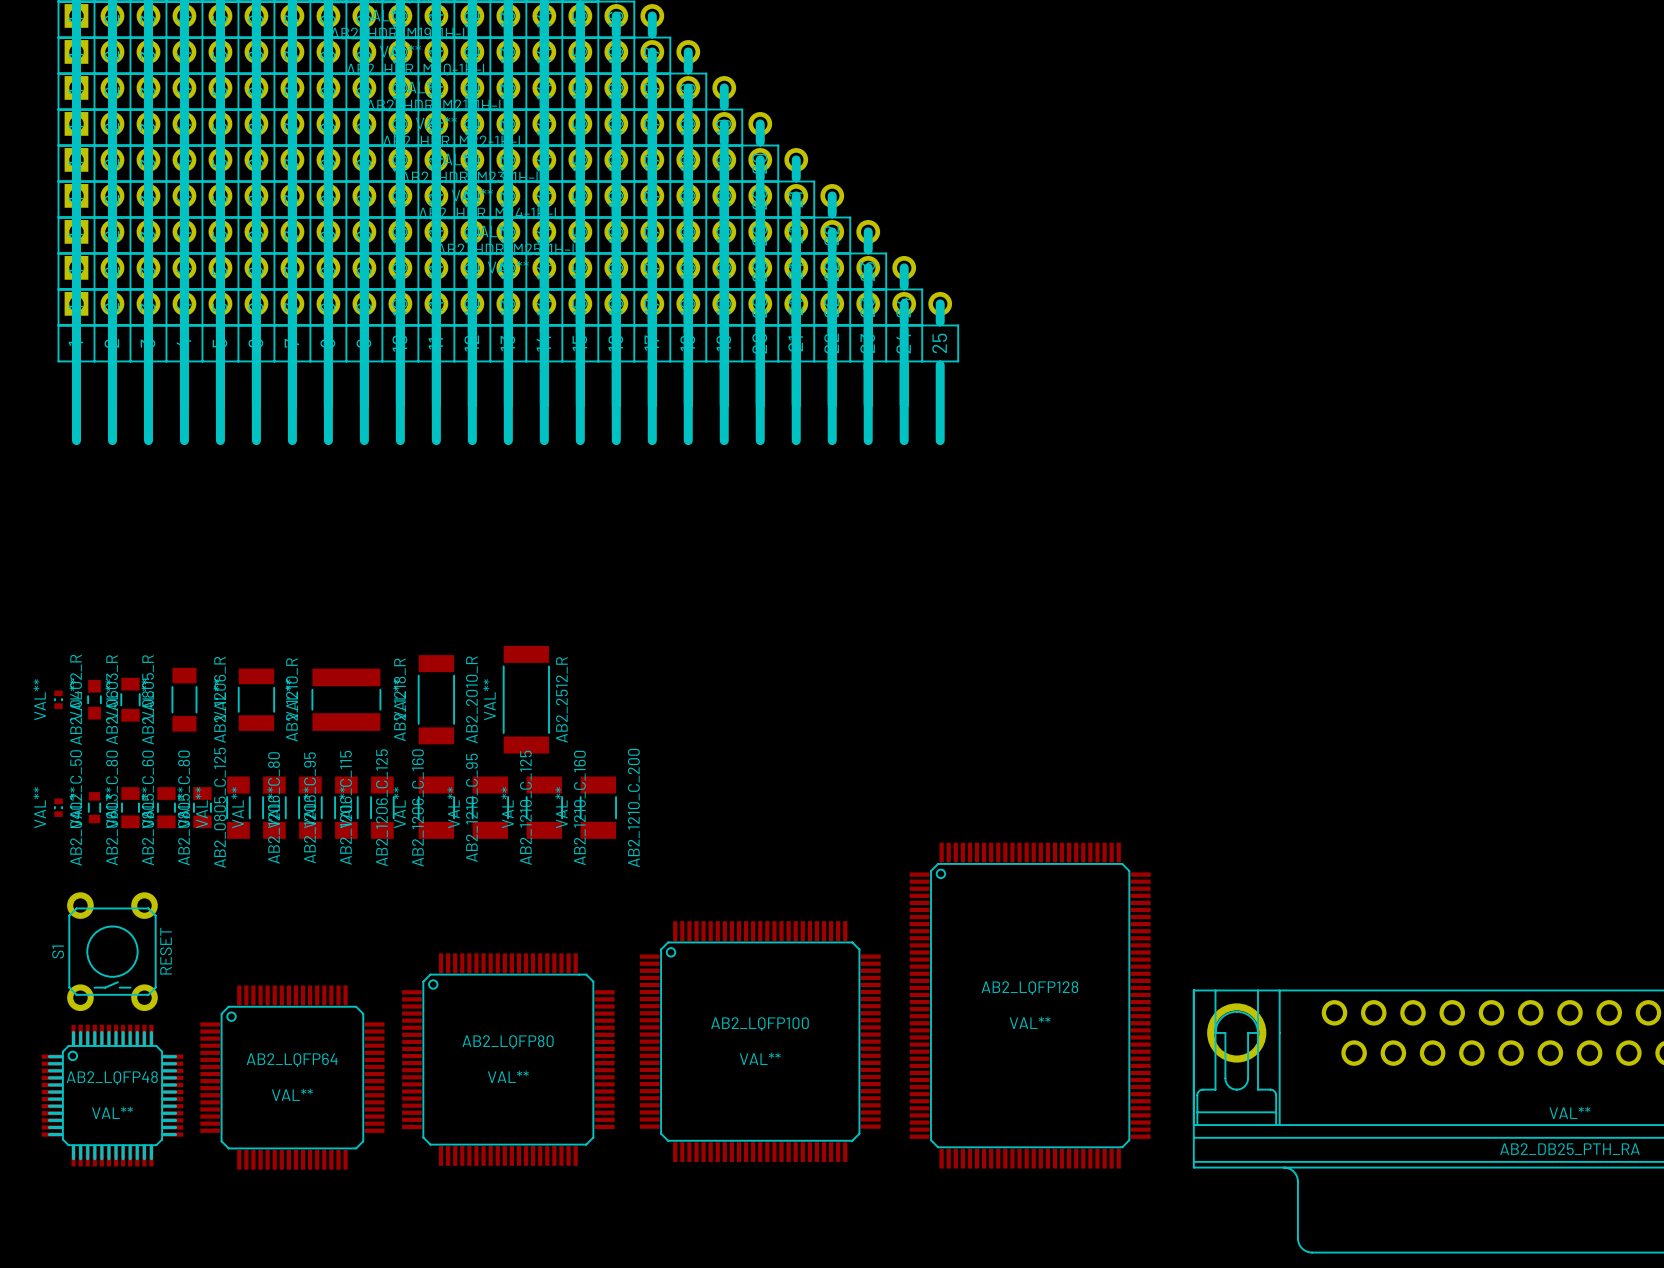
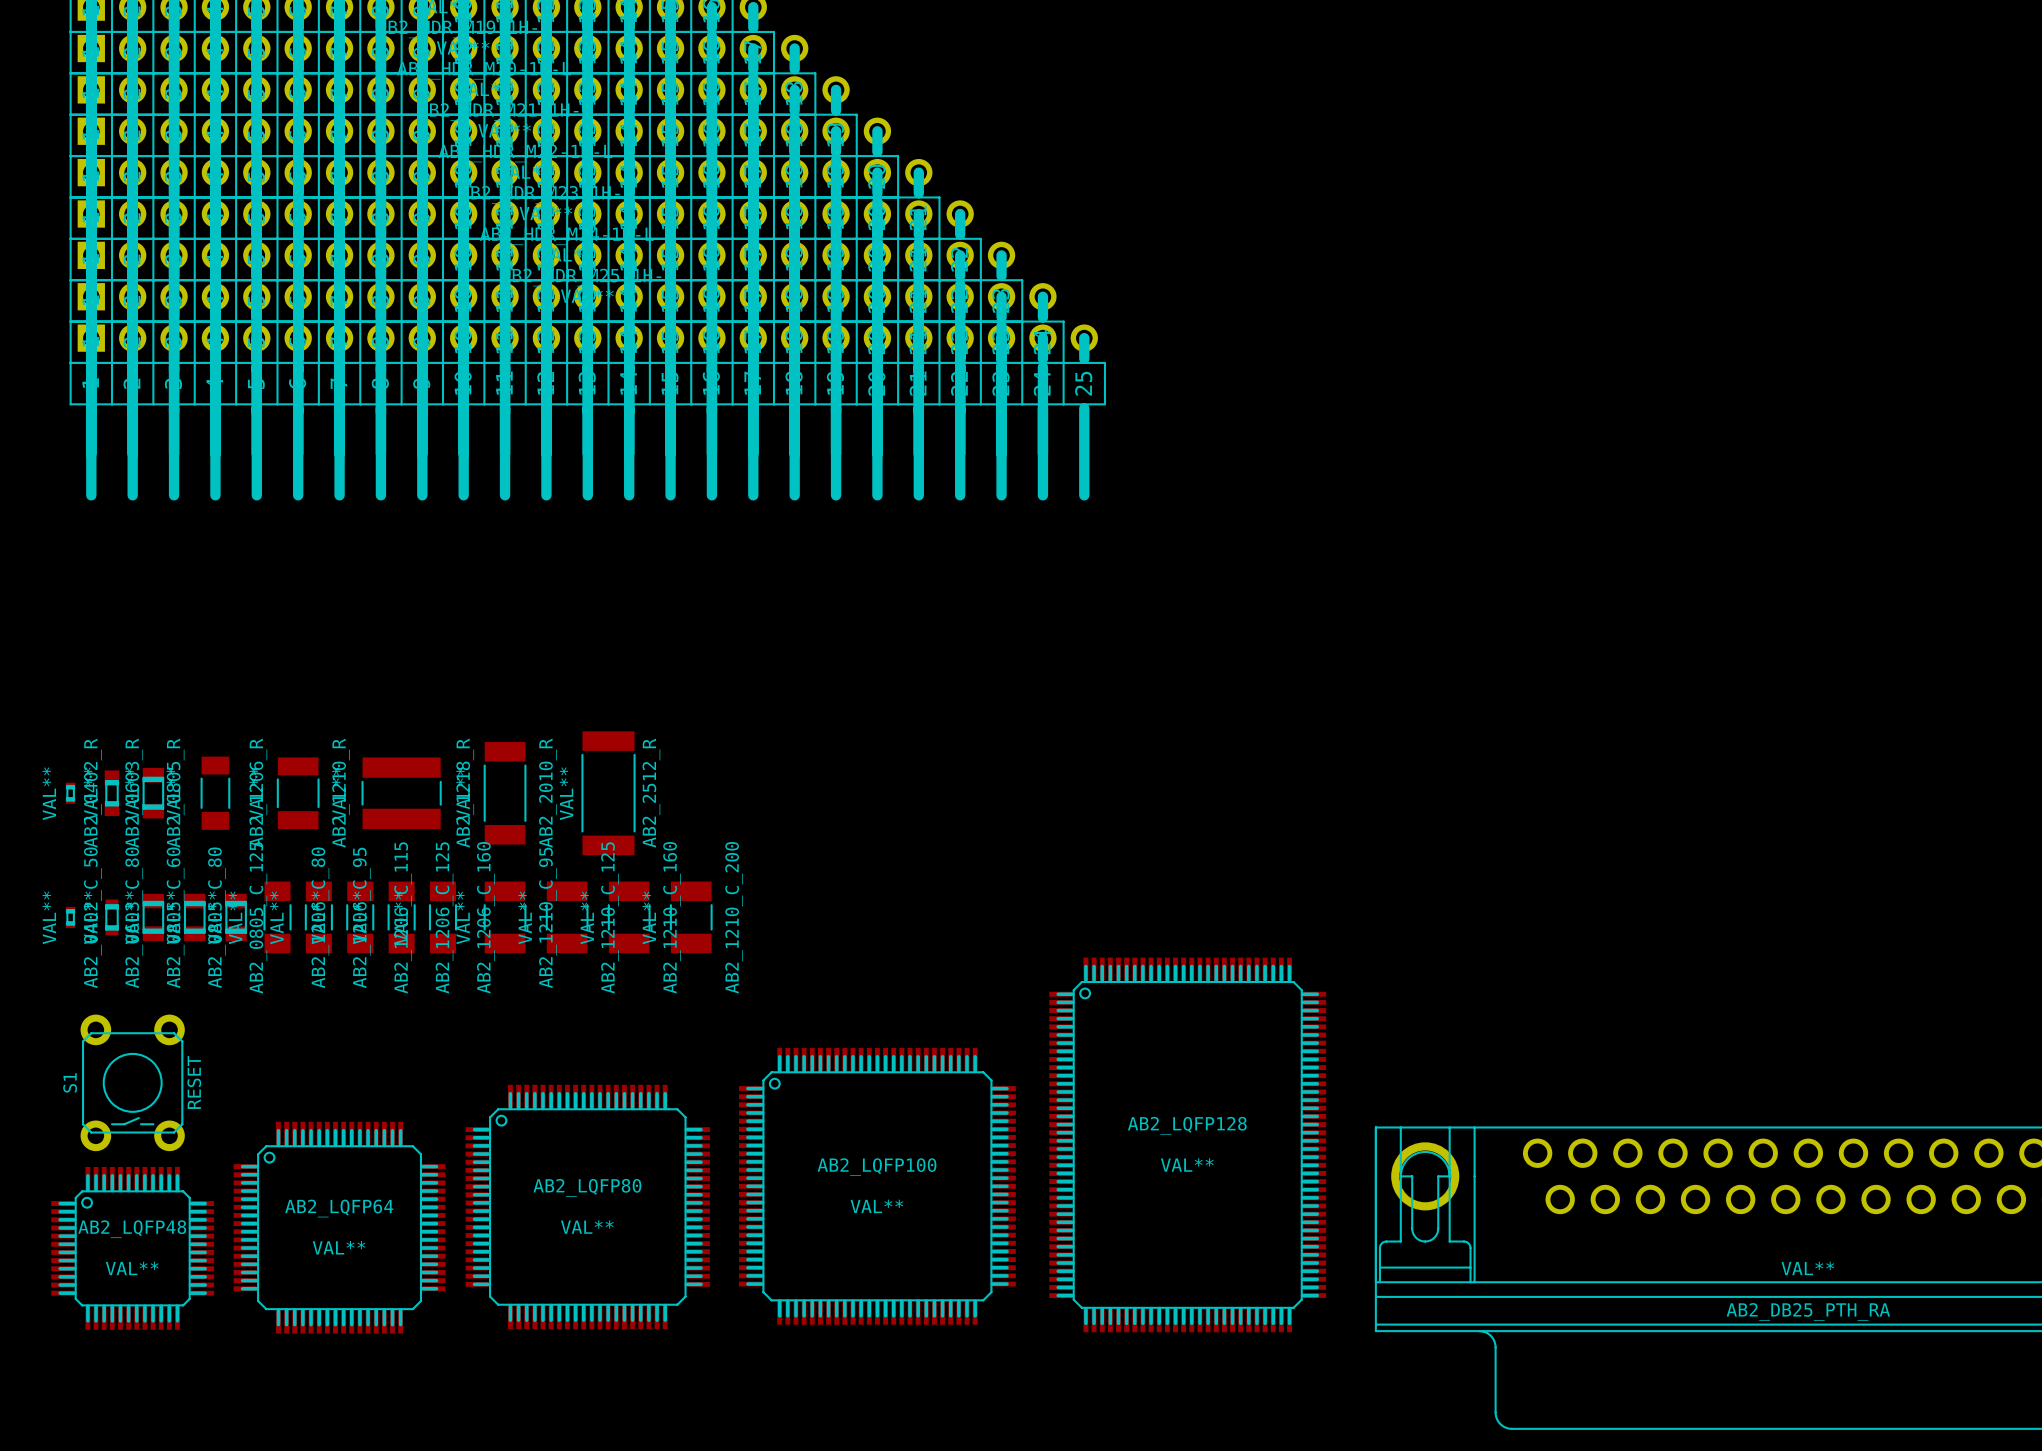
AB2_0805_R footprint: [120, 677, 141, 722] -> [142, 767, 165, 819]
AB2_0603_R footprint: [87, 679, 102, 720] -> [104, 770, 120, 817]
AB2_0402_R footprint: [54, 690, 63, 709] -> [65, 782, 76, 804]
AB2_0805_C_60 footprint: [121, 787, 140, 829] -> [142, 893, 165, 941]
AB2_0805_C_80 footprint: [157, 787, 176, 829] -> [183, 893, 206, 941]
AB2_0805_C_125 footprint: [193, 787, 212, 829] -> [225, 893, 247, 941]
AB2_0603_C_80 footprint: [87, 792, 102, 824] -> [105, 899, 119, 936]
AB2_0402_C_50 footprint: [54, 798, 63, 817] -> [65, 906, 76, 928]
AB2_LQFP128 footprint: [909, 842, 1151, 1169] -> [1049, 957, 1327, 1333]
AB2_LQFP100 footprint: [639, 921, 881, 1163] -> [738, 1047, 1016, 1325]
AB2_LQFP80 footprint: [402, 953, 615, 1166] -> [465, 1084, 710, 1330]
AB2_LQFP64 footprint: [200, 985, 385, 1170] -> [233, 1121, 446, 1334]

